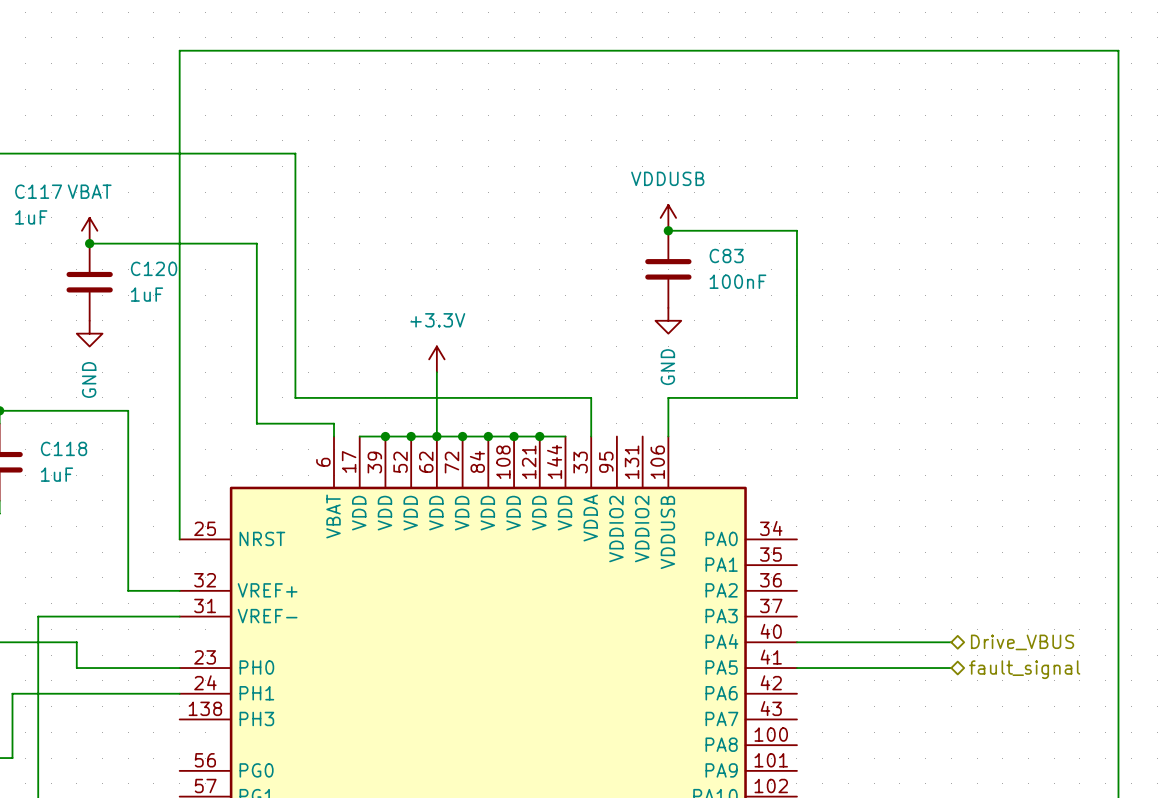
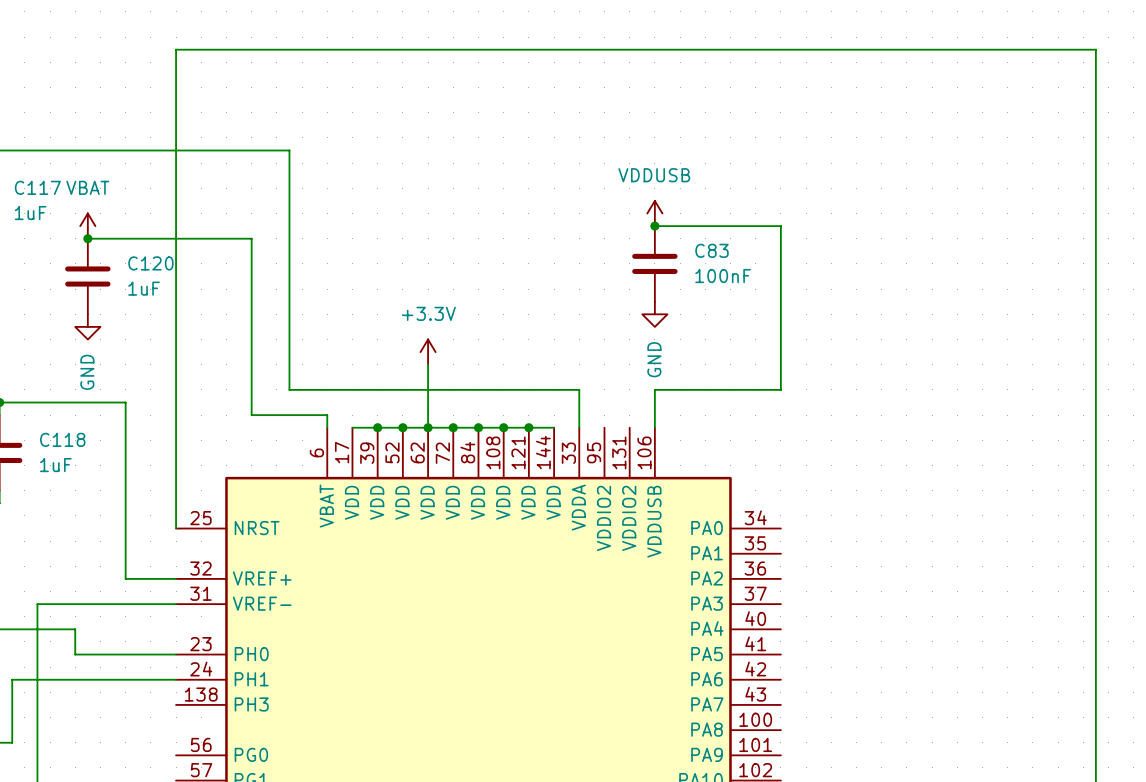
wire: (796, 642) (951, 642) -> none
hierarchical label: Drive_VBUS (1022, 642) -> none
wire: (796, 668) (951, 668) -> none
hierarchical label: fault_signal (1024, 669) -> none

